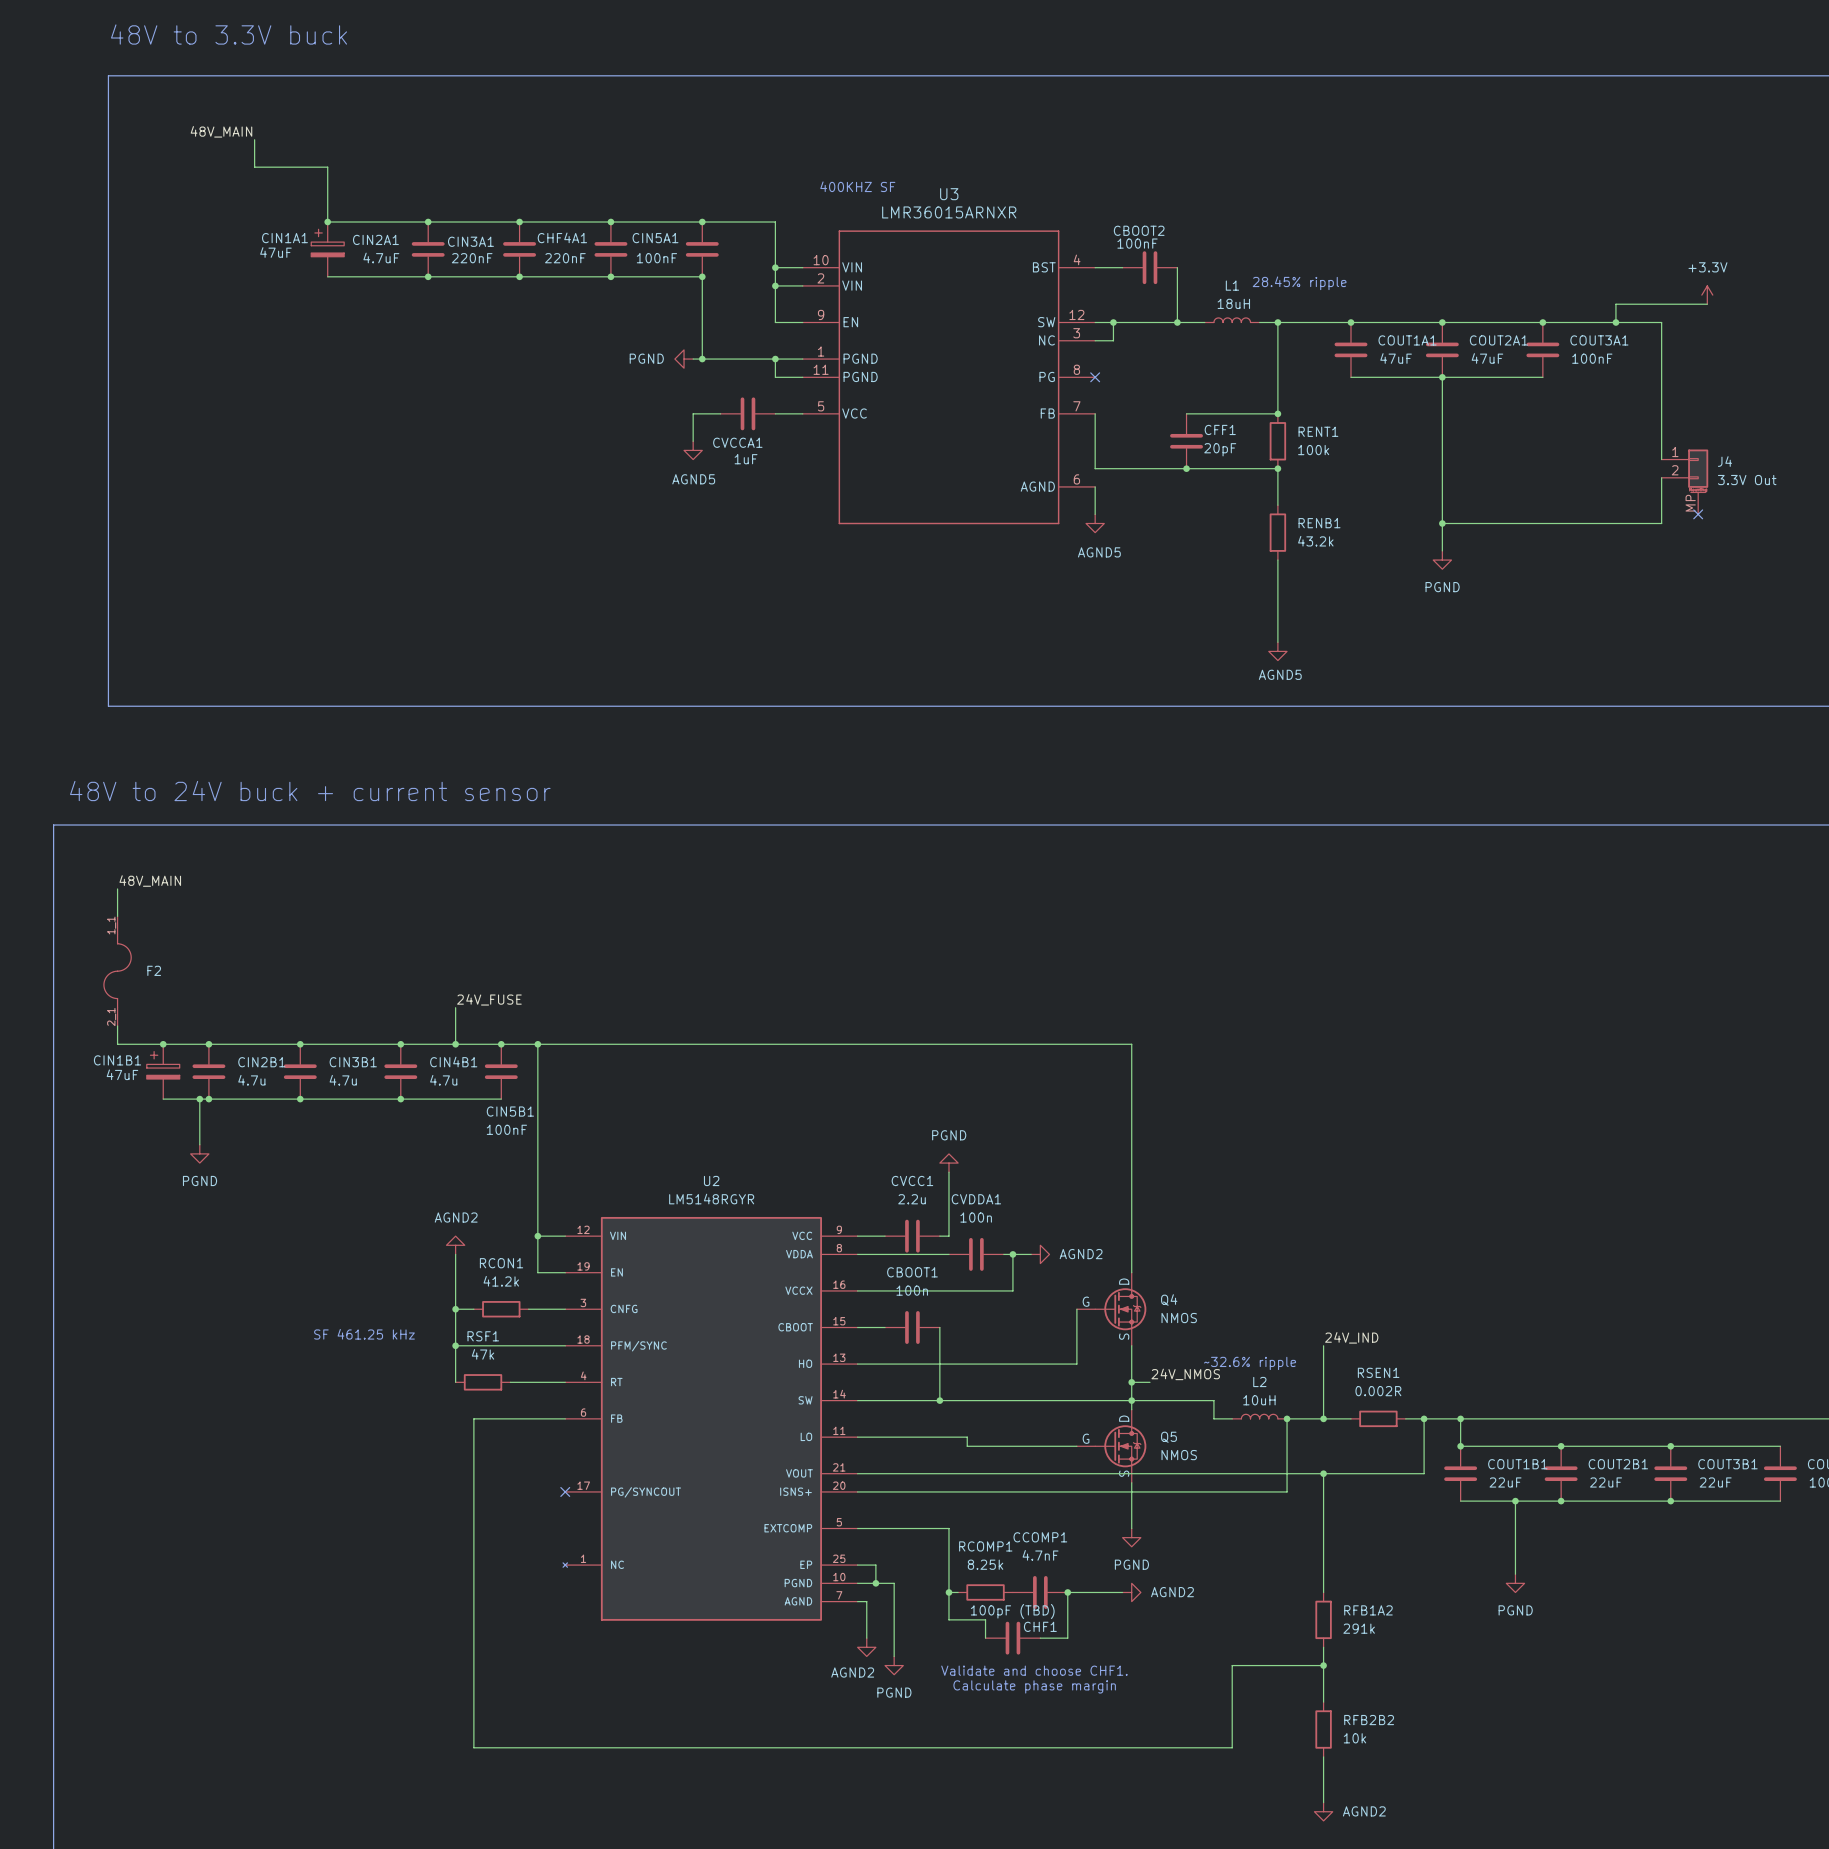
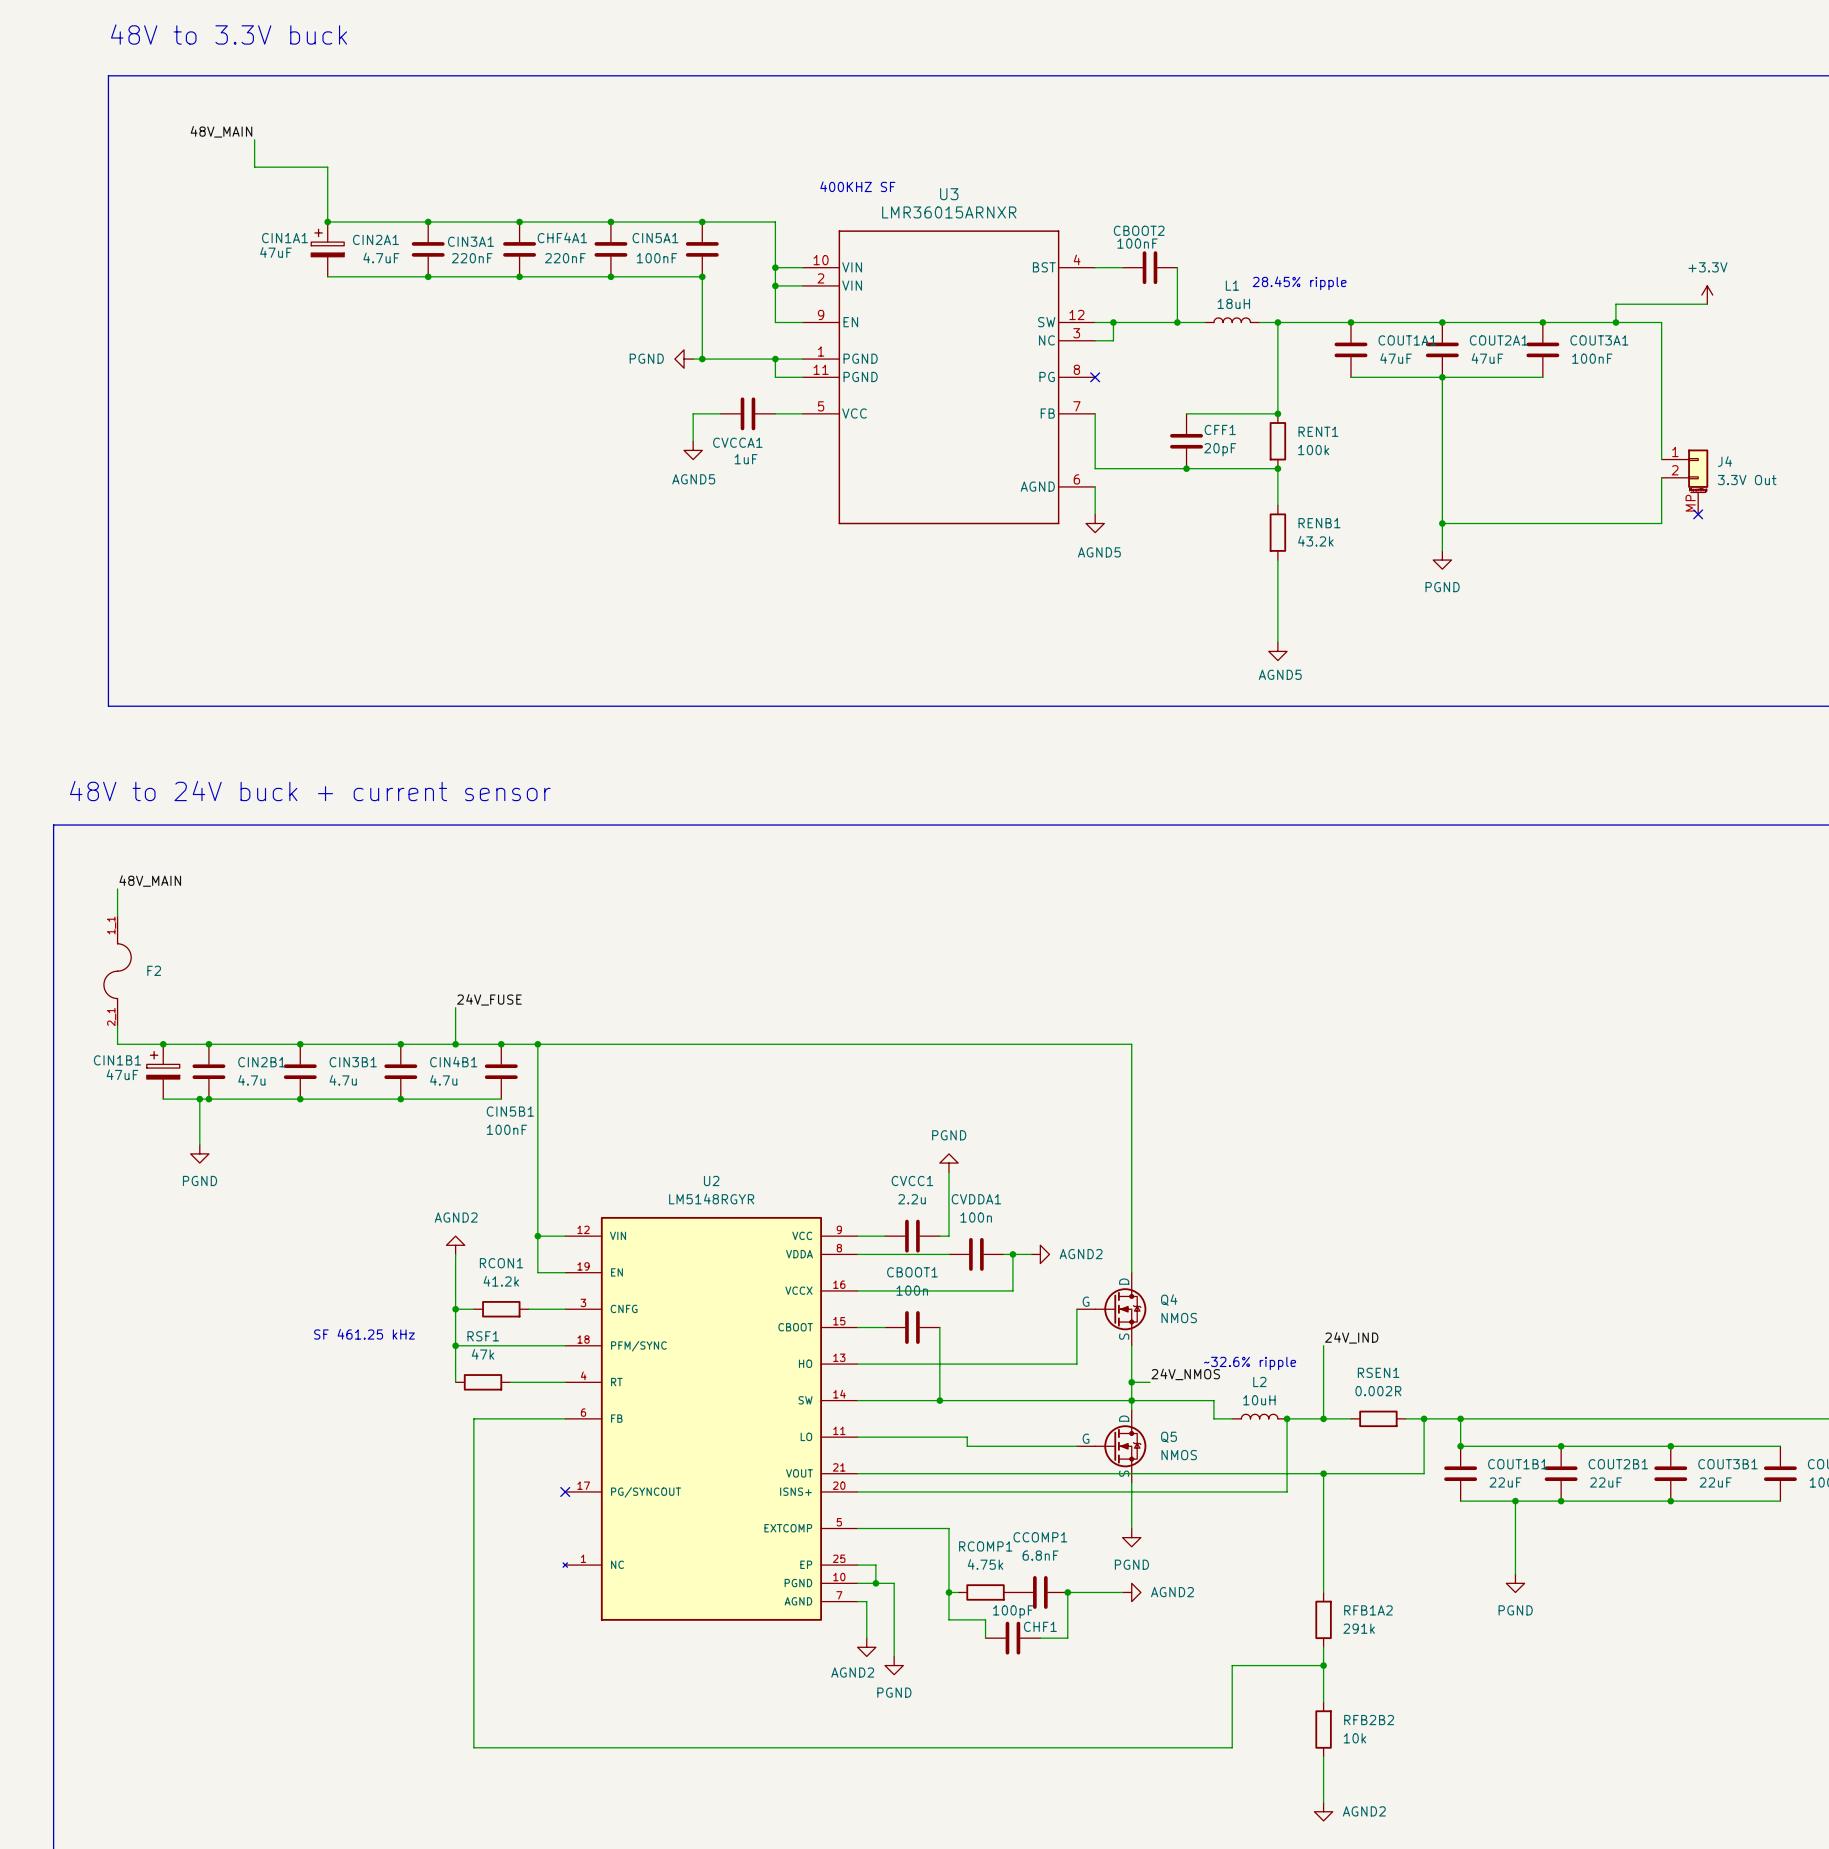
CCOMP1 value: 4.7nF (1040, 1555) -> 6.8nF (1040, 1555)
RCOMP1 value: 8.25k (985, 1564) -> 4.75k (985, 1564)
CHF1 value: 100pF (TBD) (1012, 1611) -> 100pF (1013, 1611)
text: Validate and choose CHF1. (1034, 1670) -> none
text: Calculate phase margin (1034, 1686) -> none

